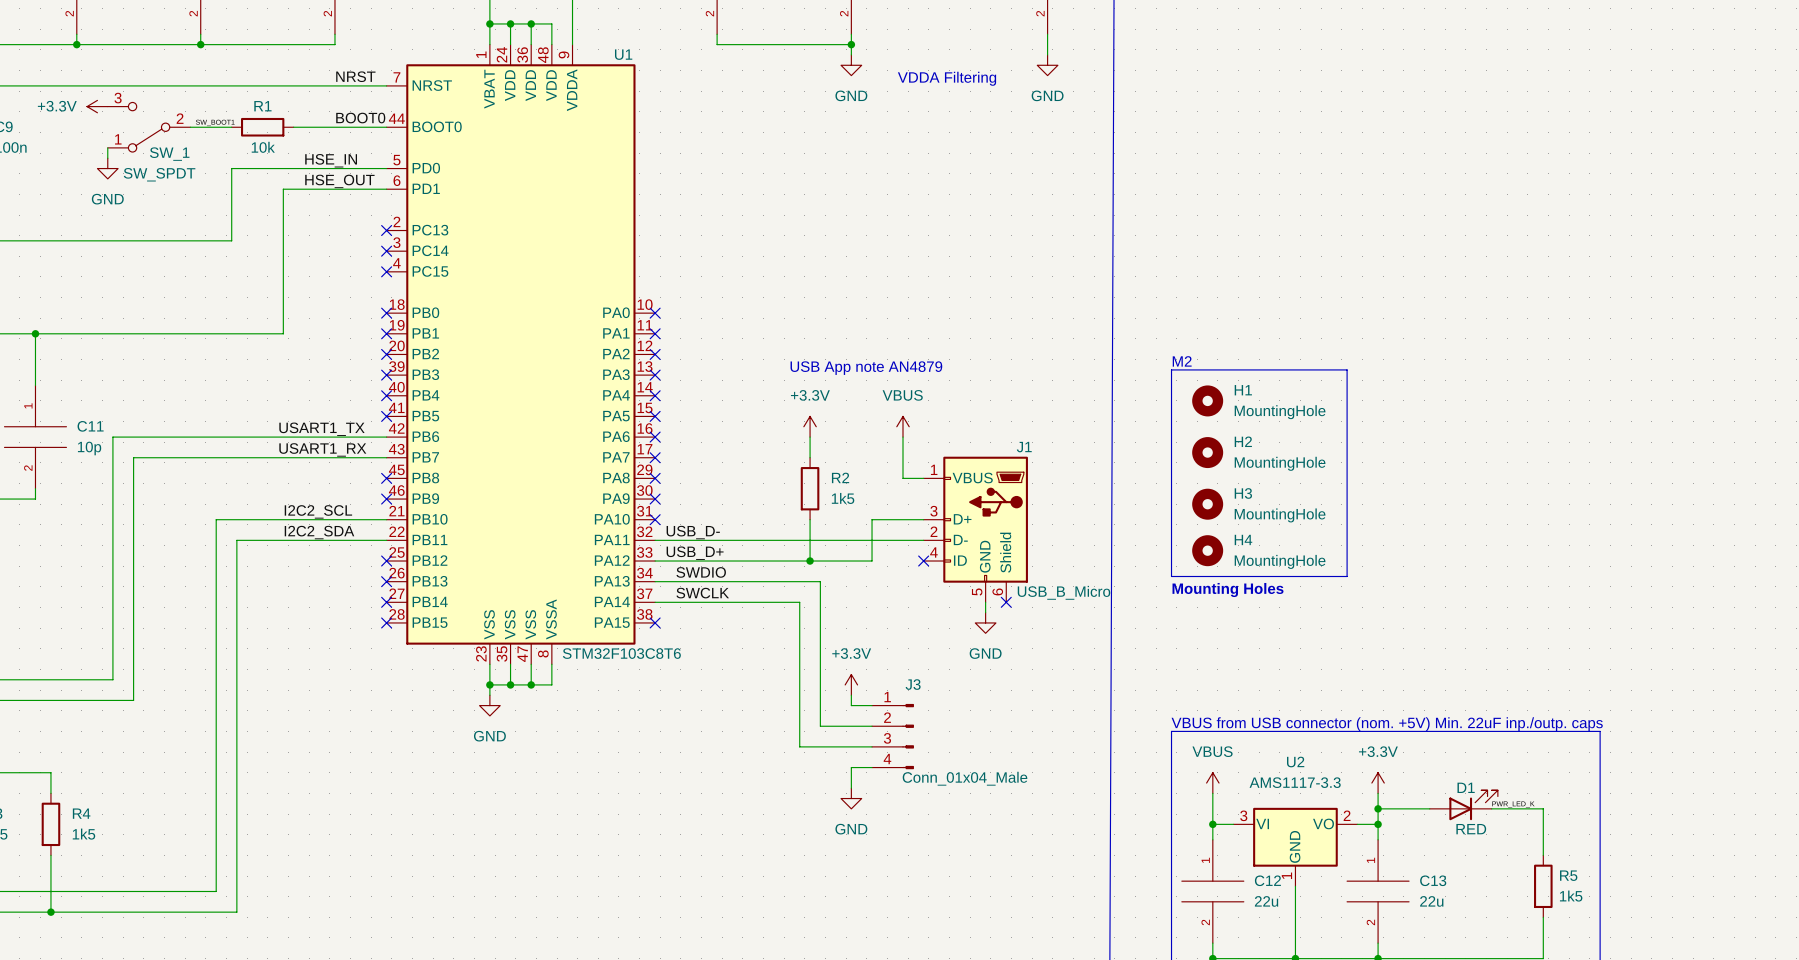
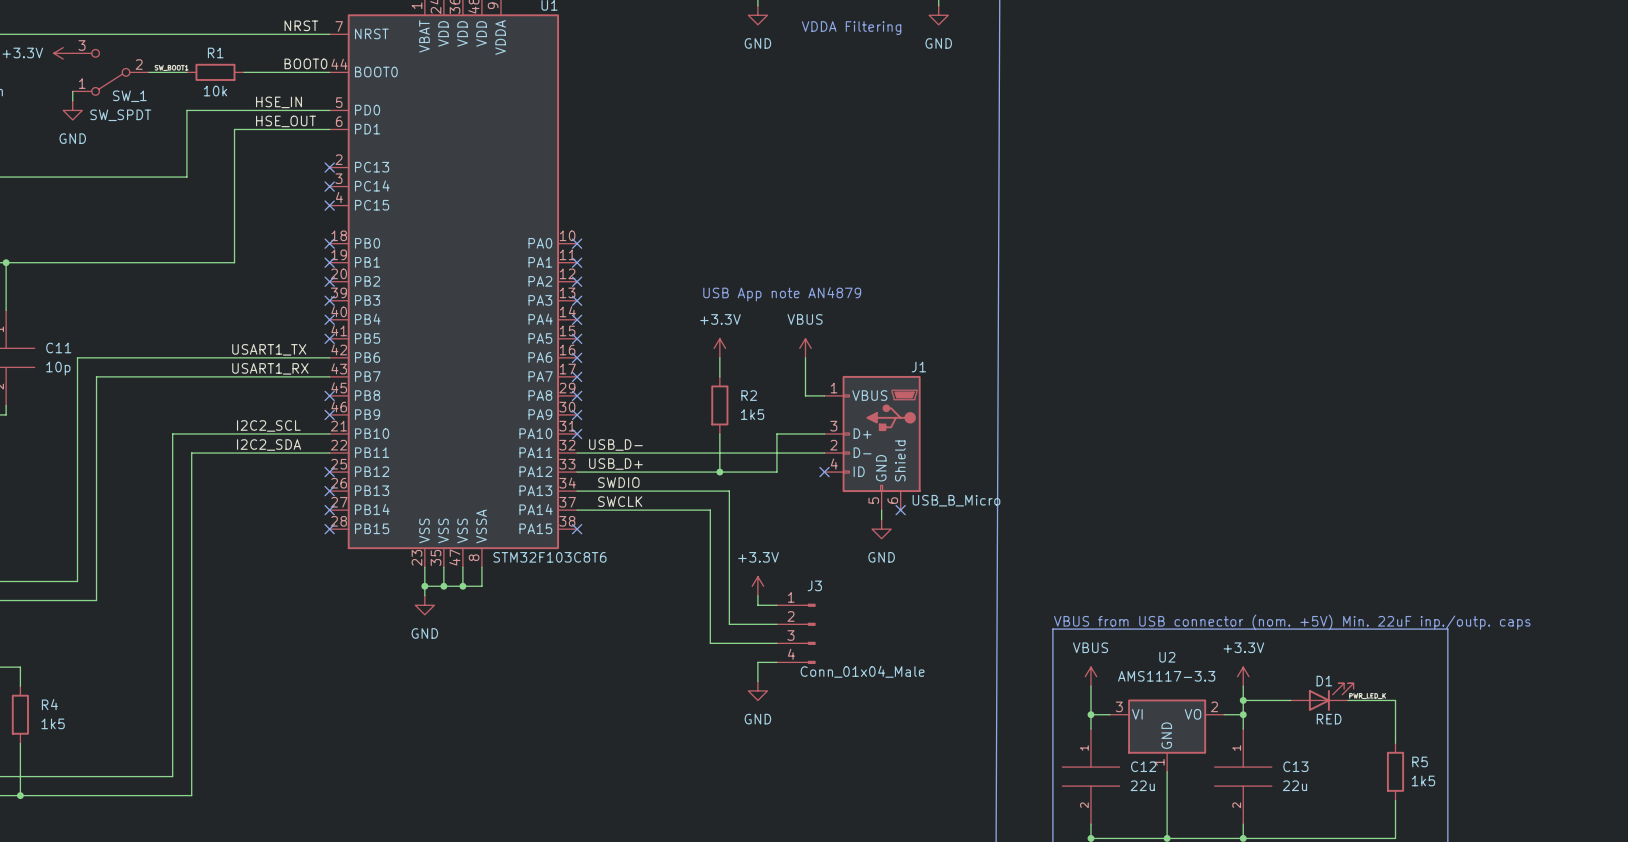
text: M2 (1182, 361) -> none
line: (1171, 369) (1347, 369) (1347, 576) (1171, 576) (1171, 369) -> none
H1: MountingHole (1207, 400) -> none
H2: MountingHole (1207, 452) -> none
H3: MountingHole (1207, 504) -> none
H4: MountingHole (1207, 550) -> none
text: Mounting Holes (1228, 590) -> none

